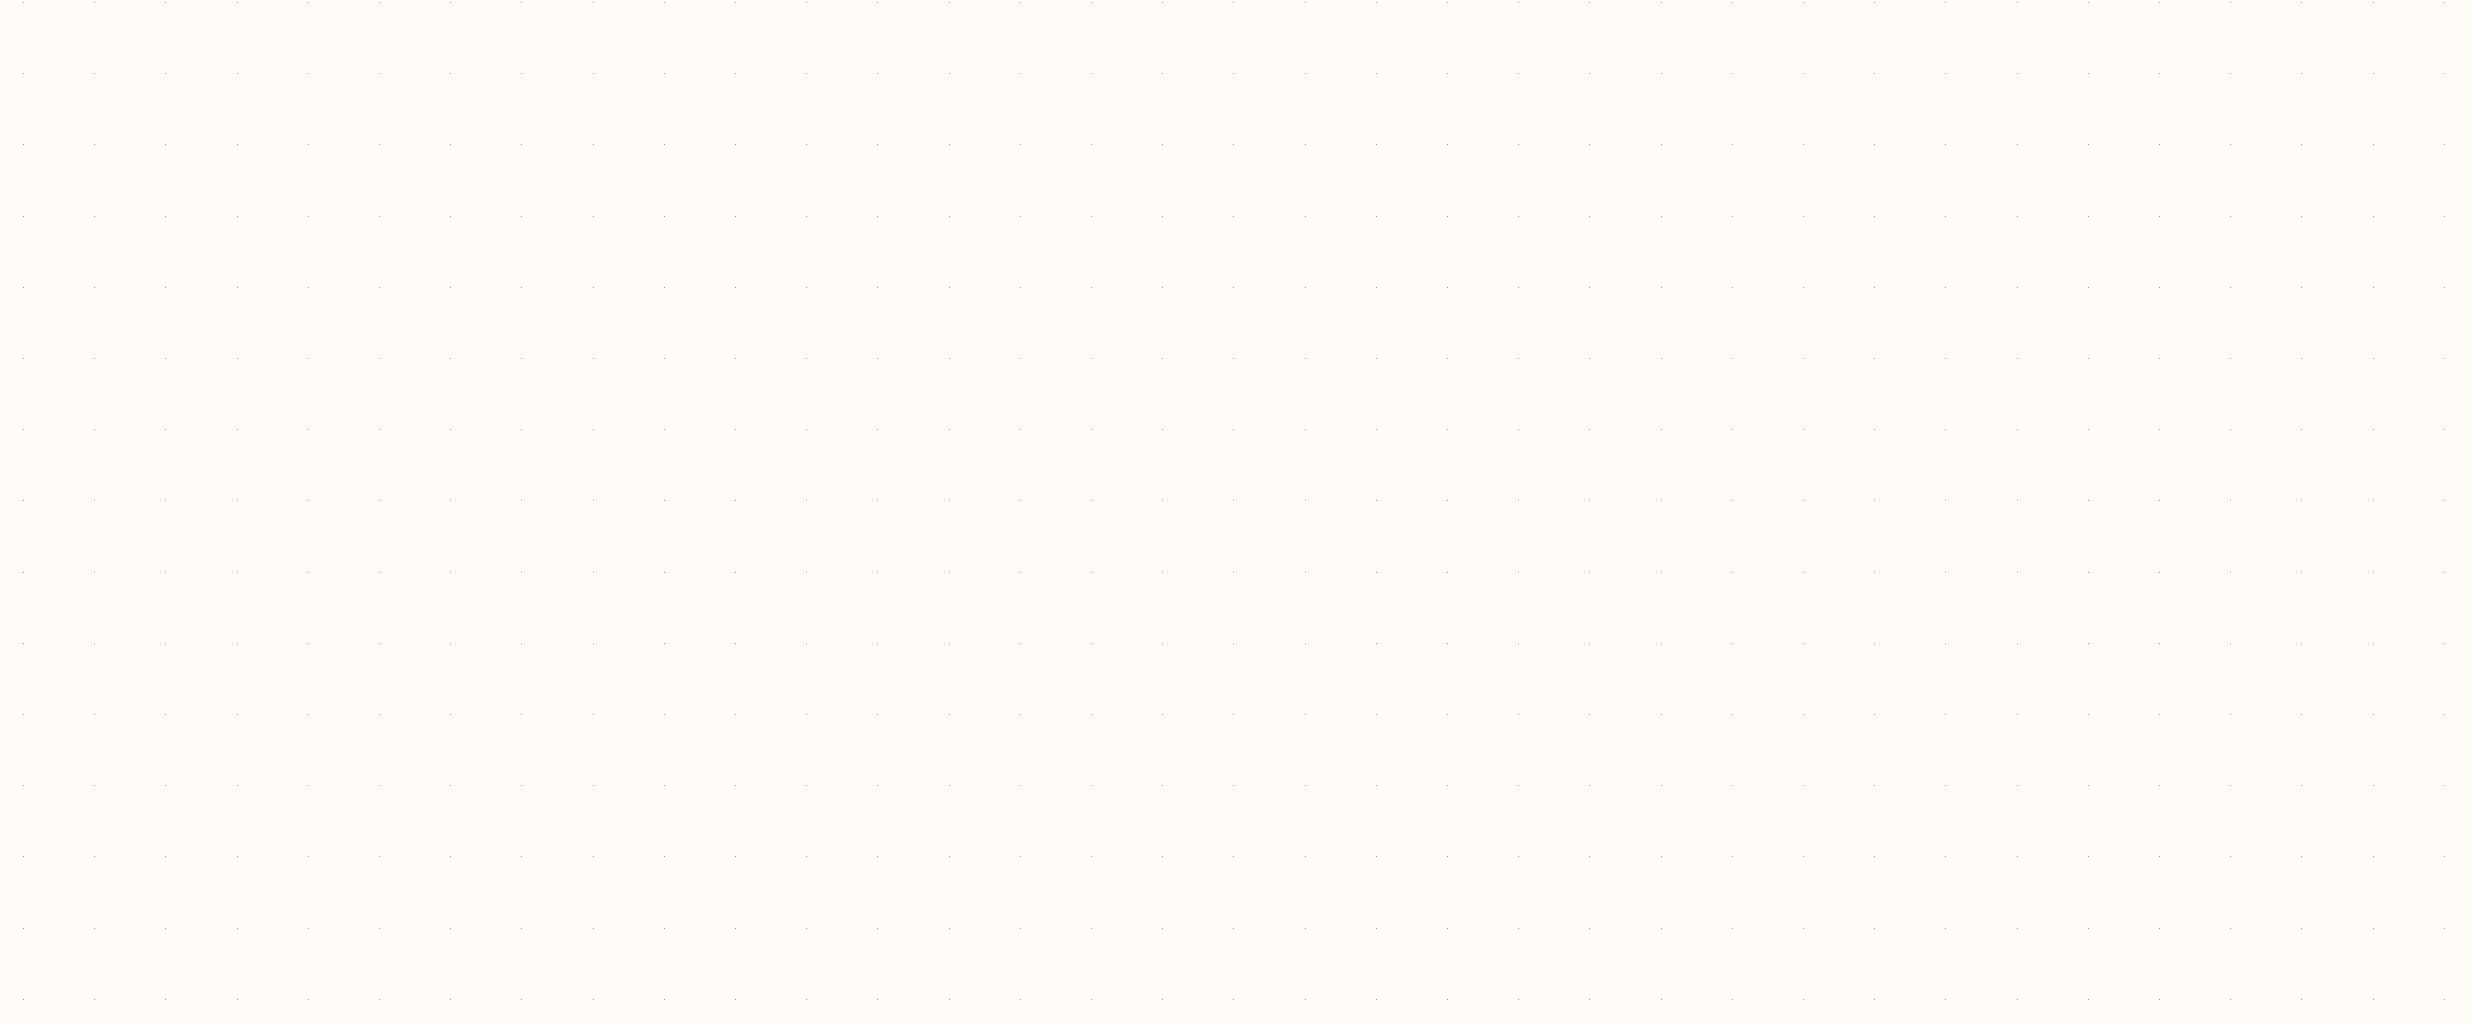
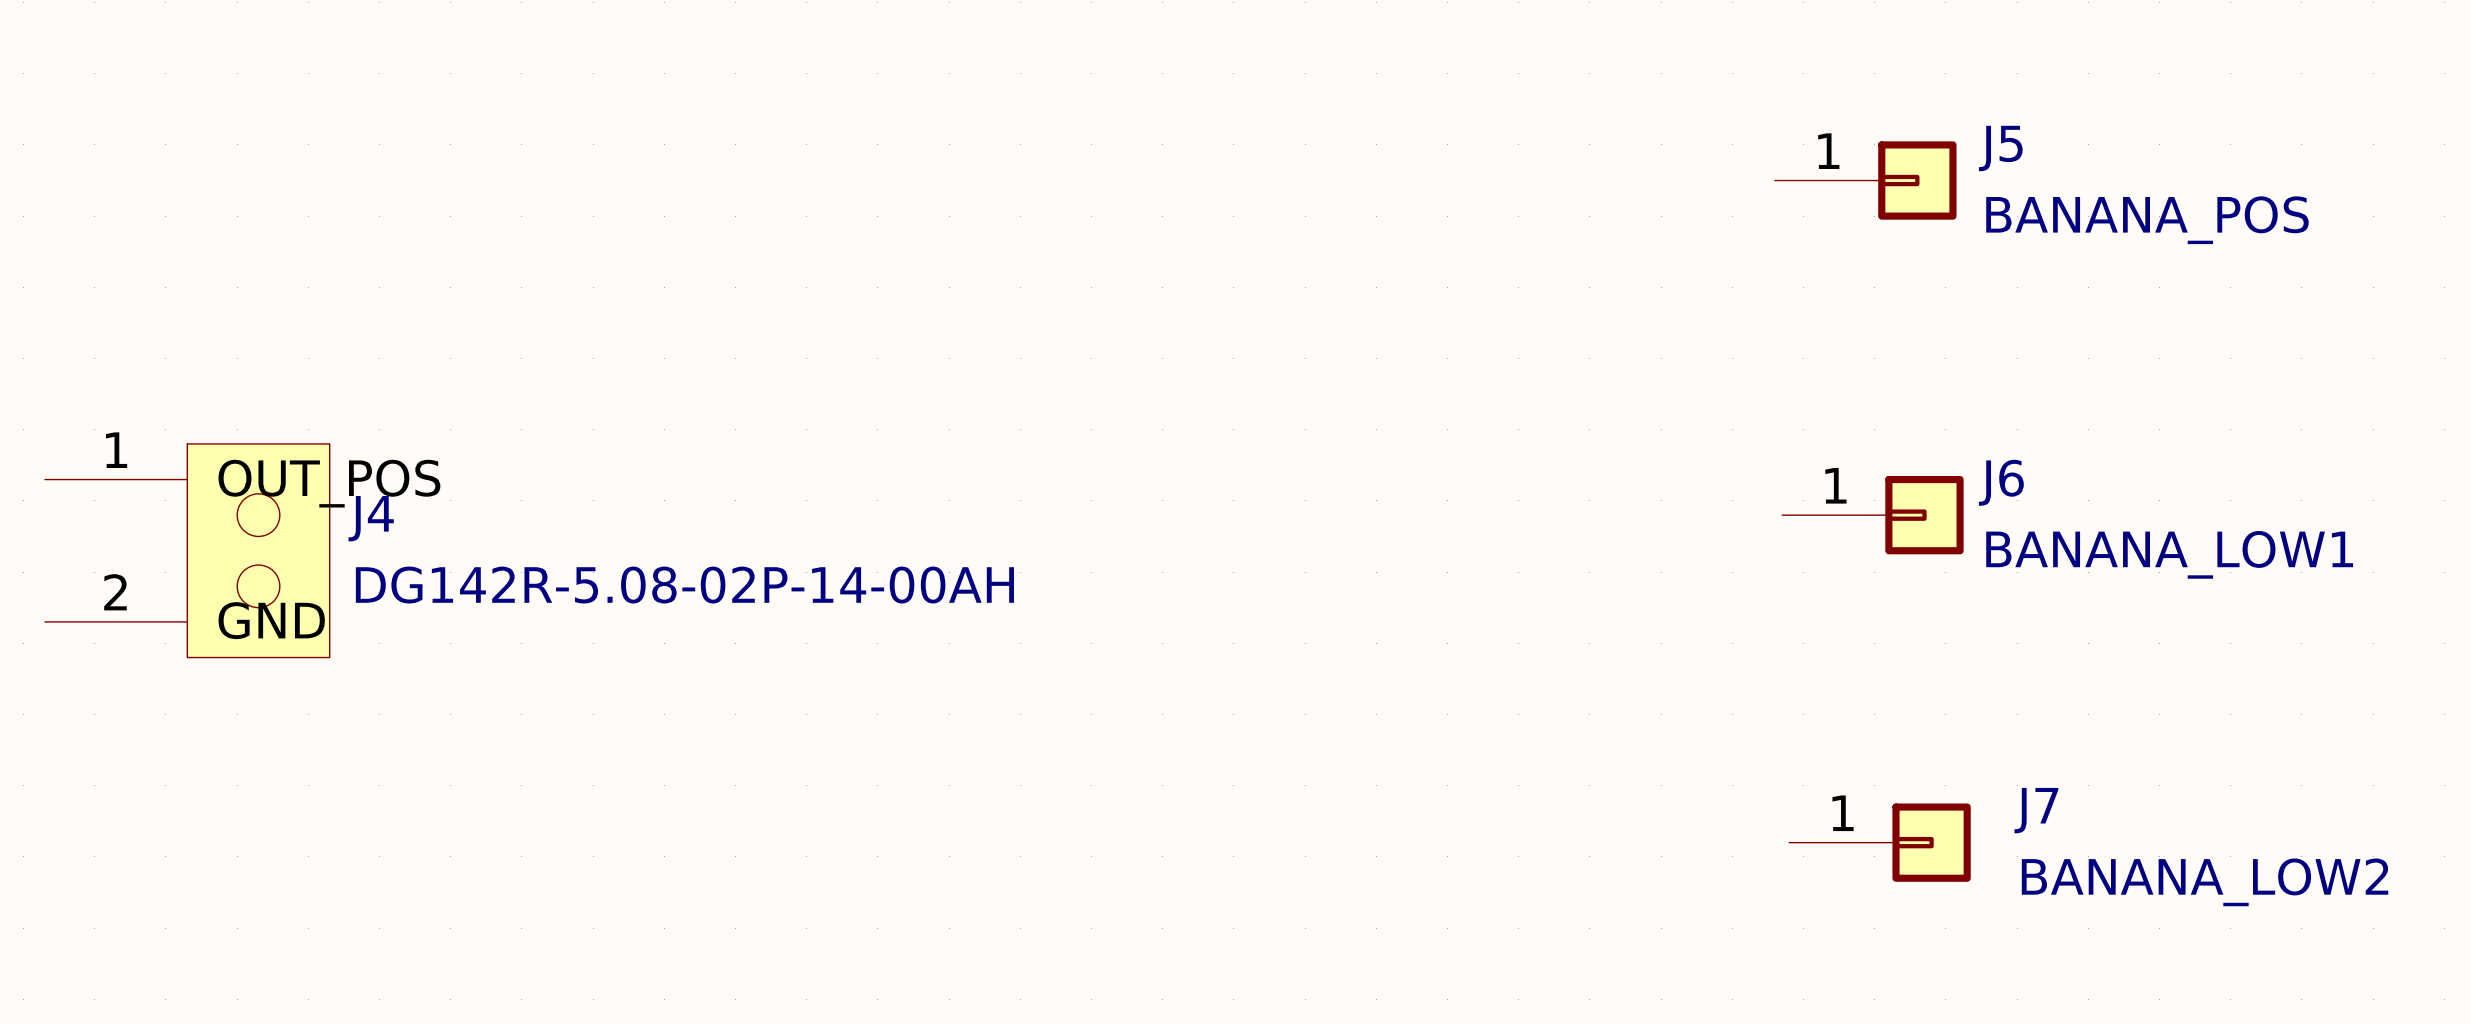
J5: none -> BANANA_POS (1865, 180)
J6: none -> BANANA_LOW1 (1872, 515)
J4: none -> DG142R-5.08-02P-14-00AH (187, 550)
J7: none -> BANANA_LOW2 (1879, 842)

